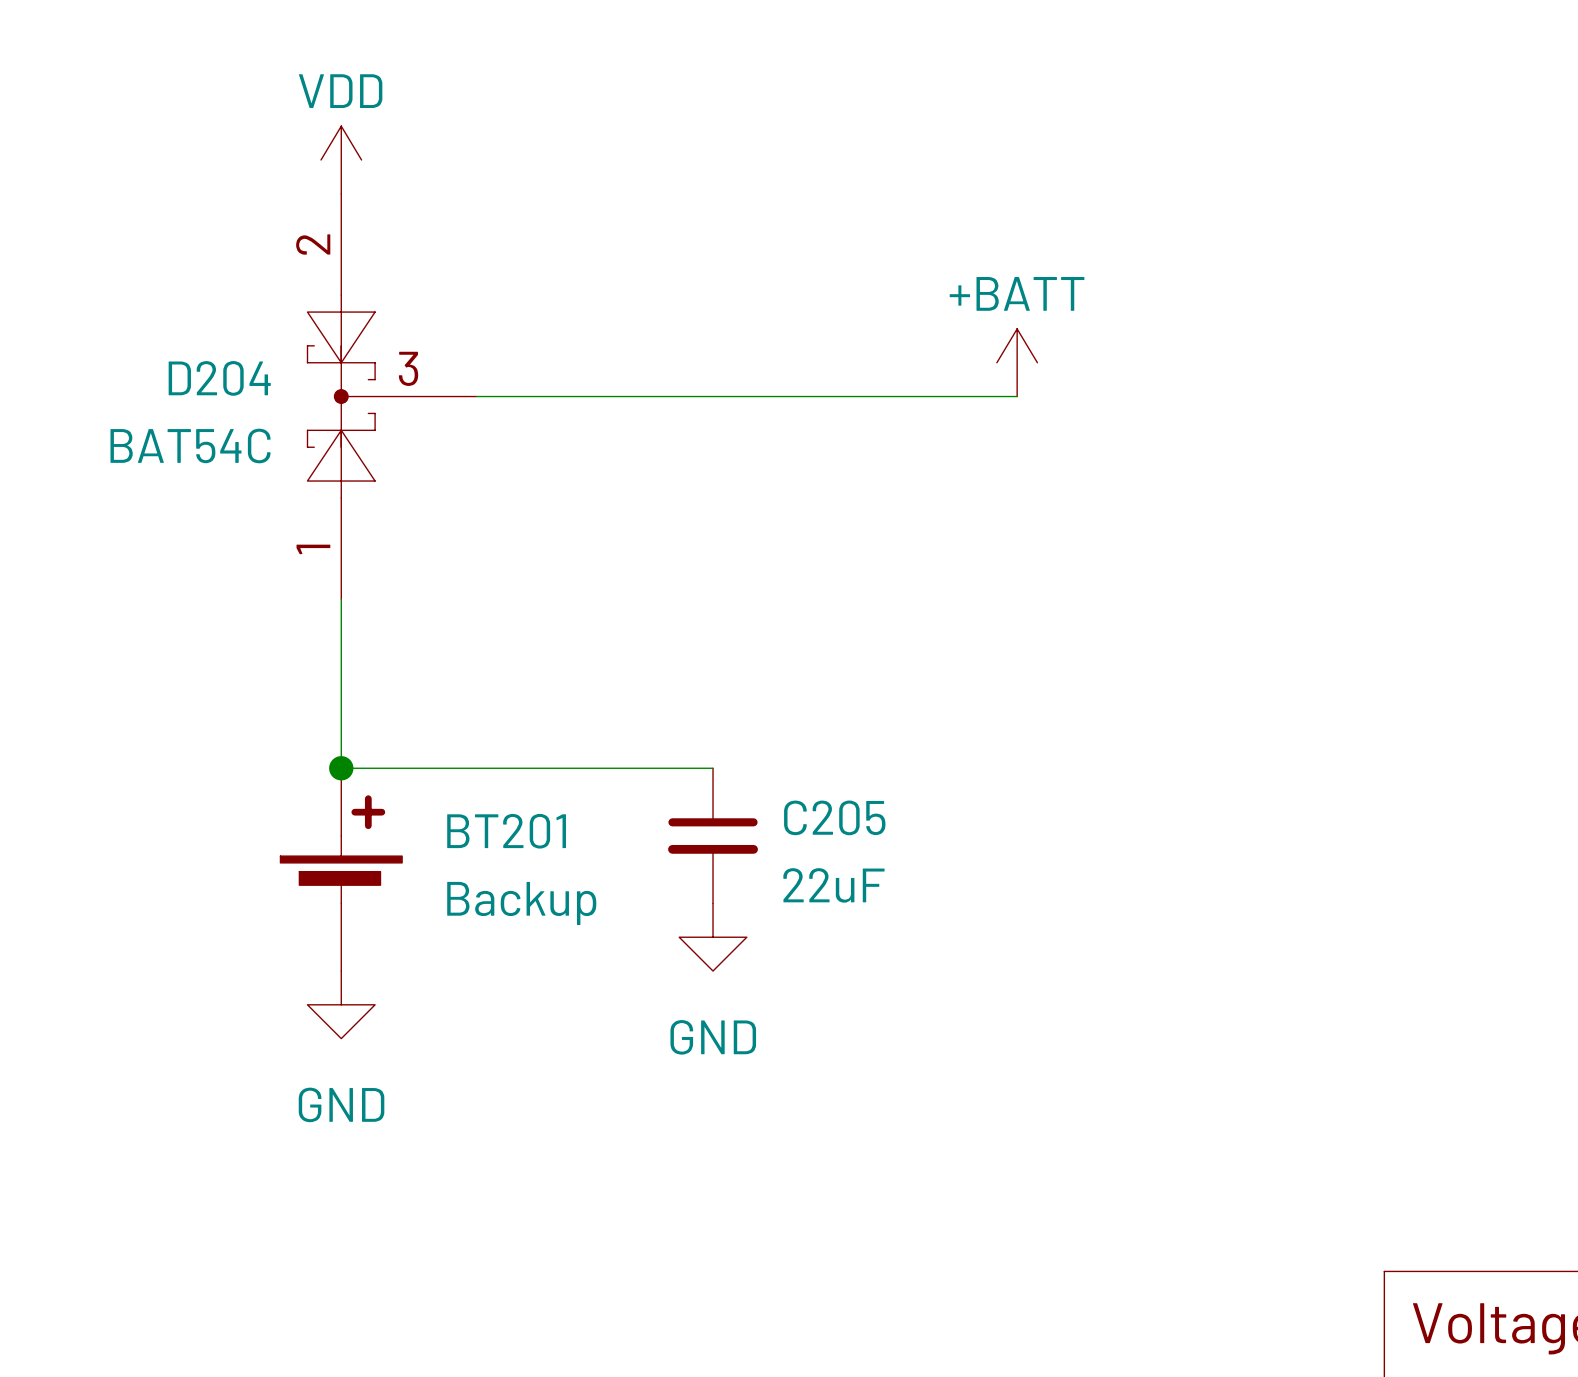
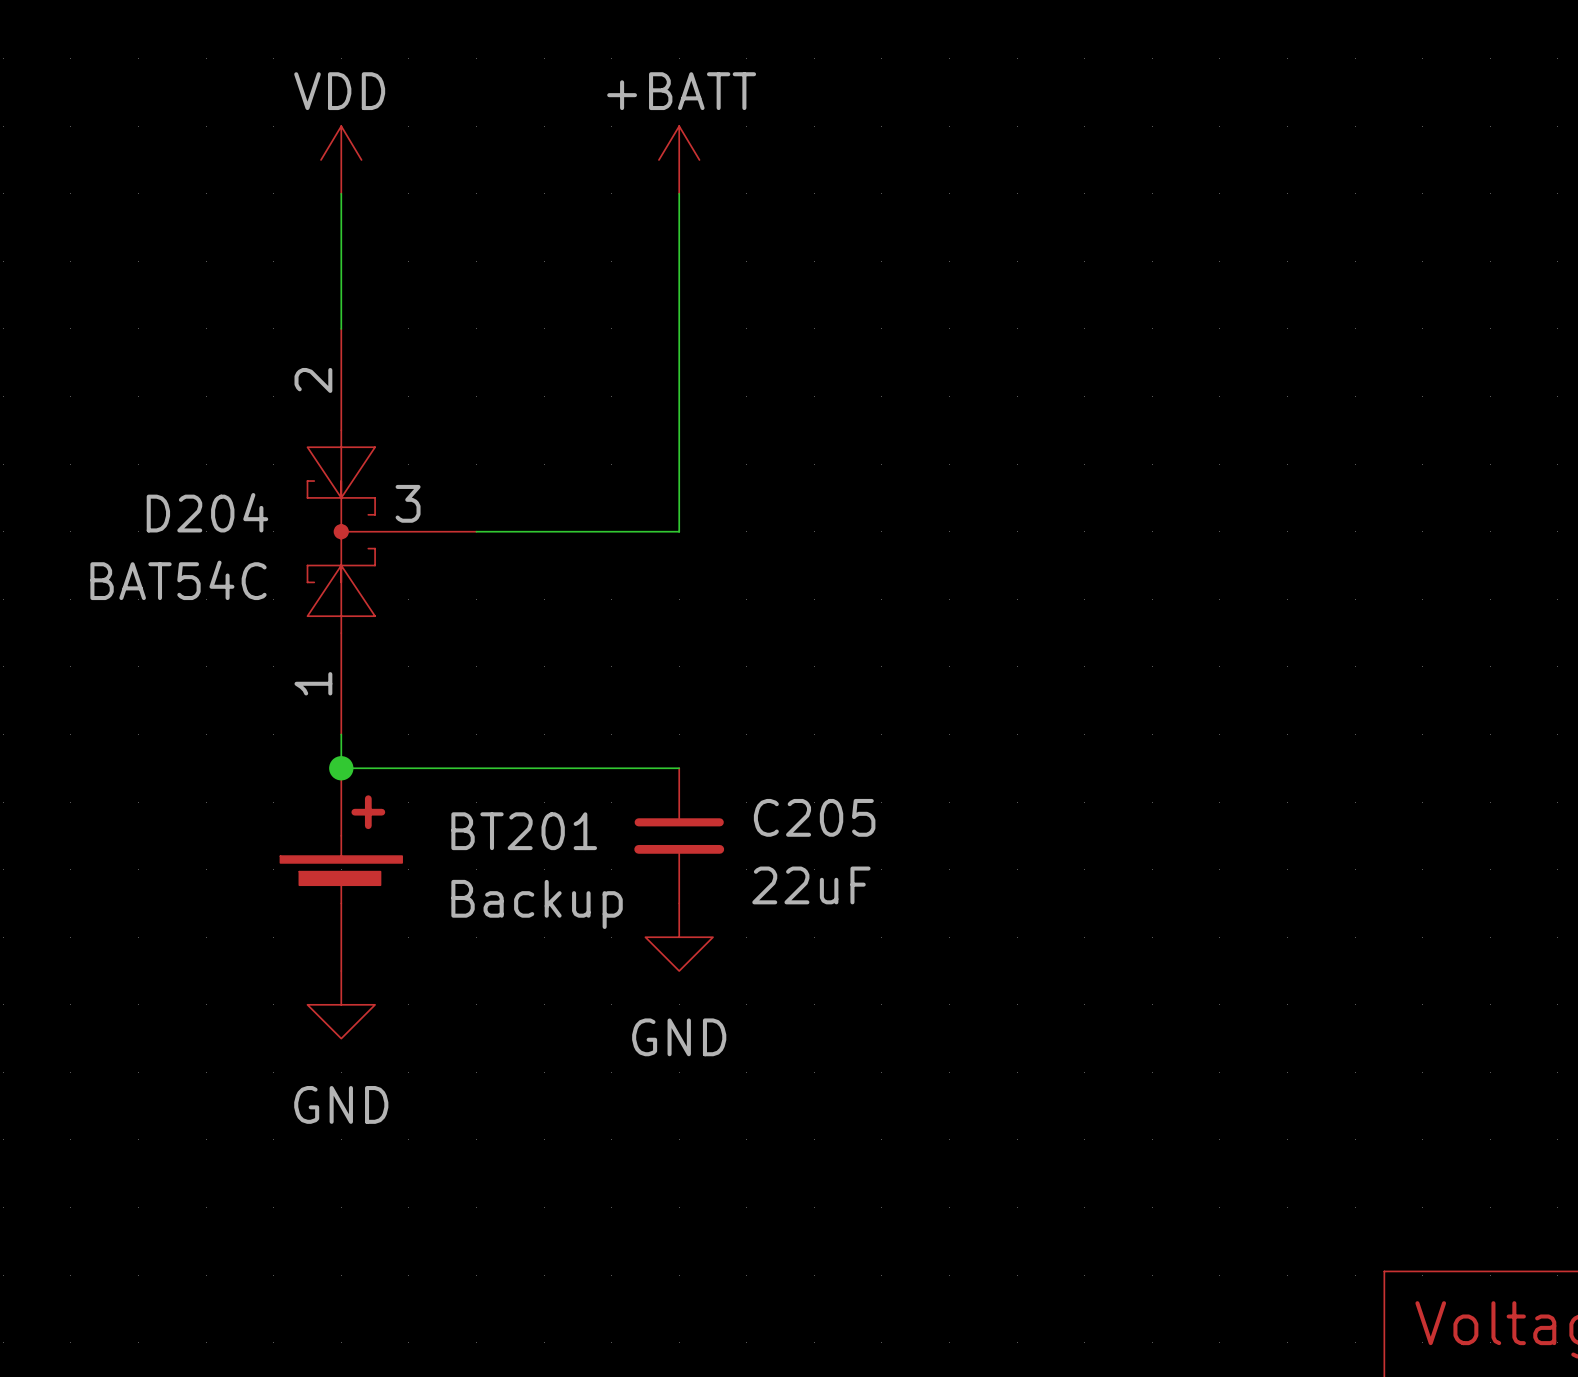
wire: none -> (679, 193) (679, 531) (476, 531)
power symbol position: +BATT (1017, 362) -> +BATT (679, 159)
D204 position: (391, 396) -> (391, 531)
wire: (476, 396) (1017, 396) -> none
wire: (679, 768) (713, 768) -> none
C205 position: (713, 835) -> (679, 835)
power symbol position: GND (713, 937) -> GND (679, 937)

